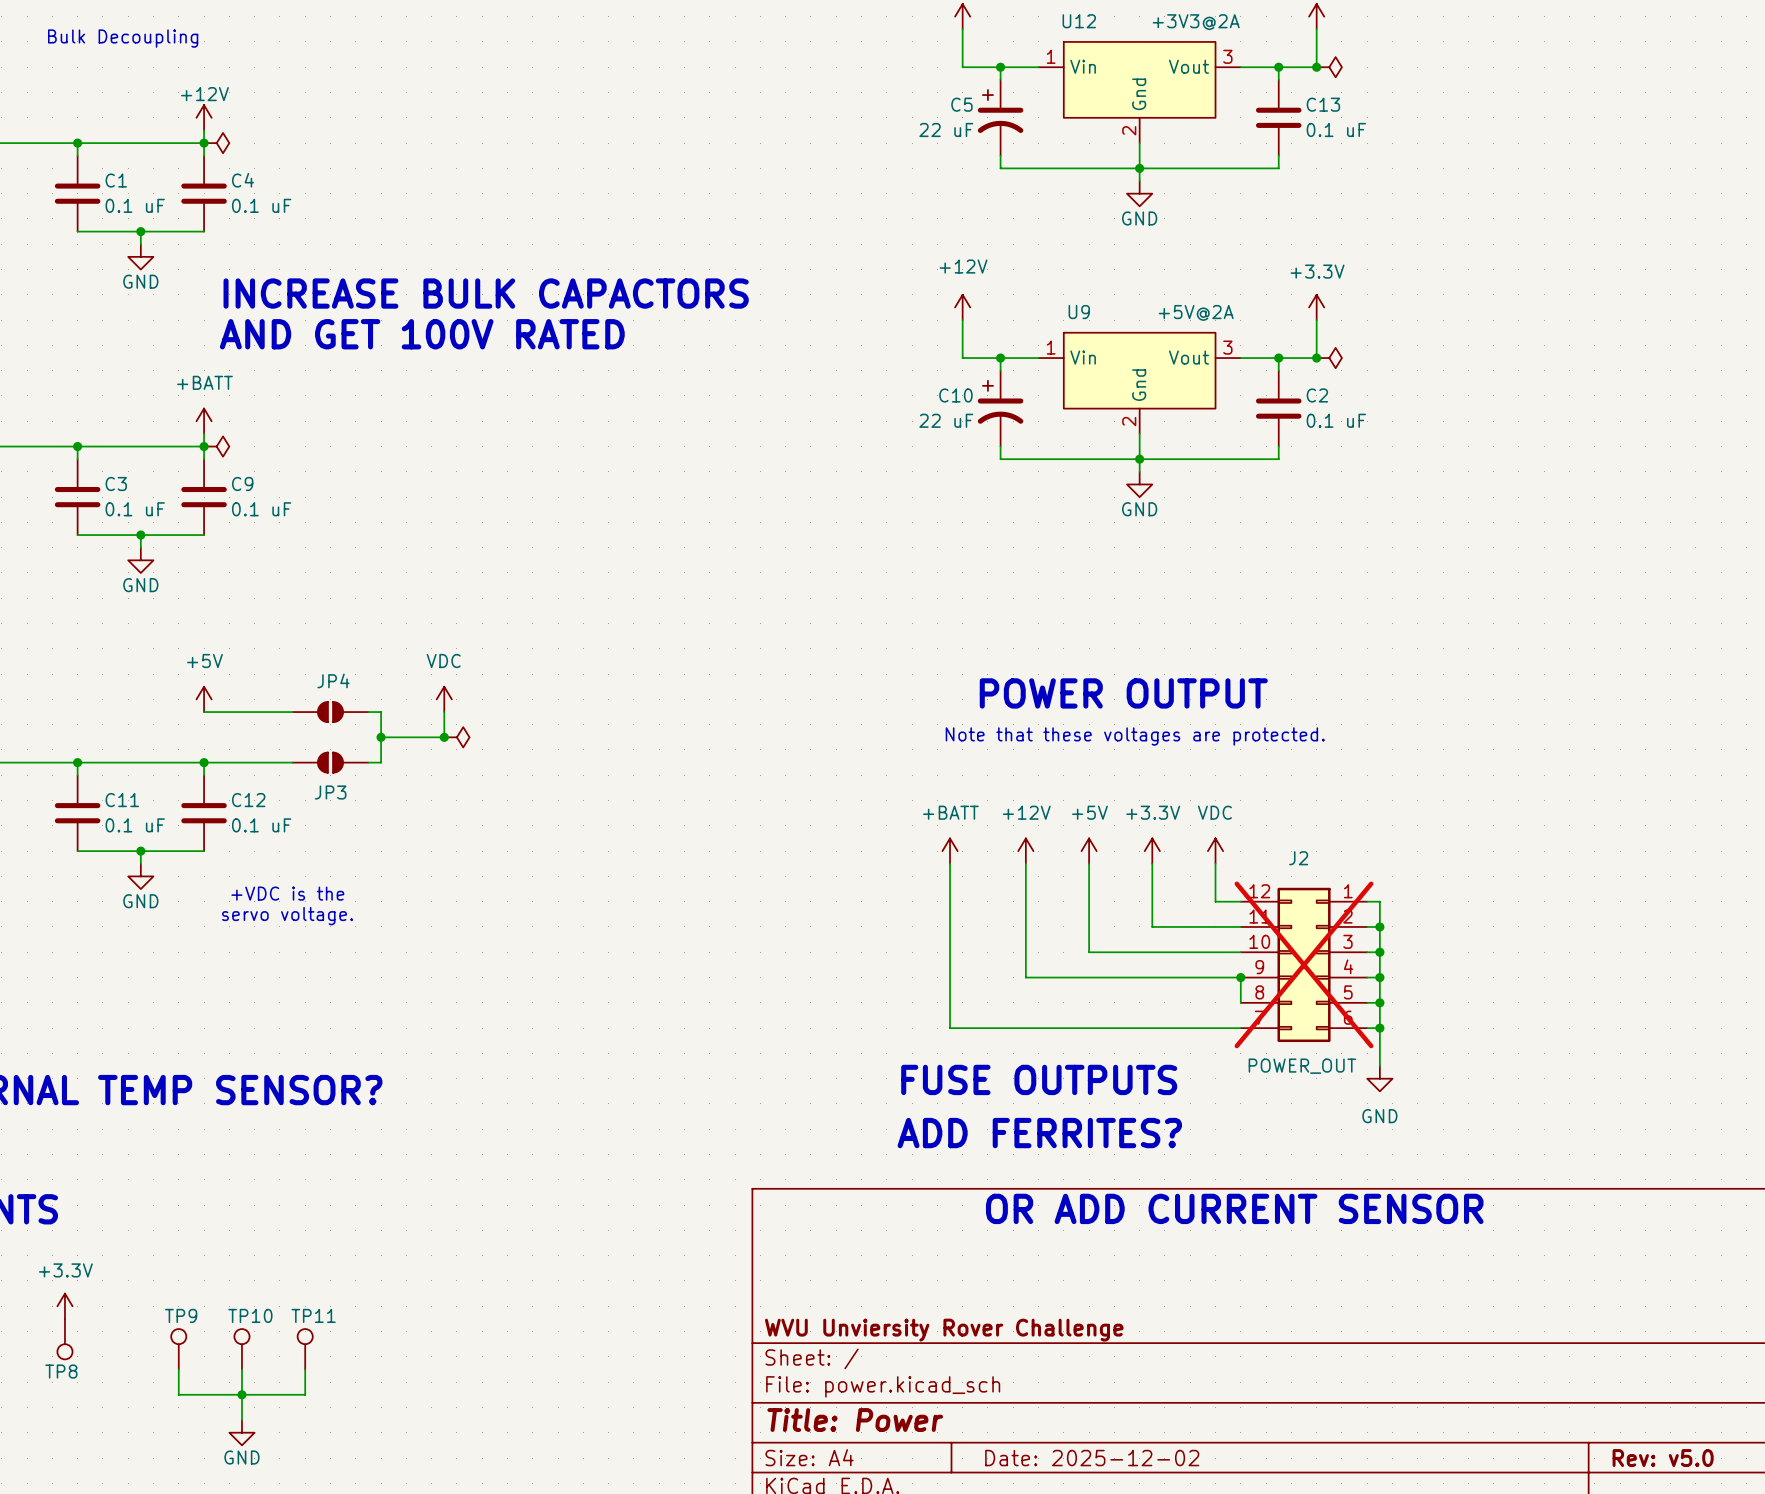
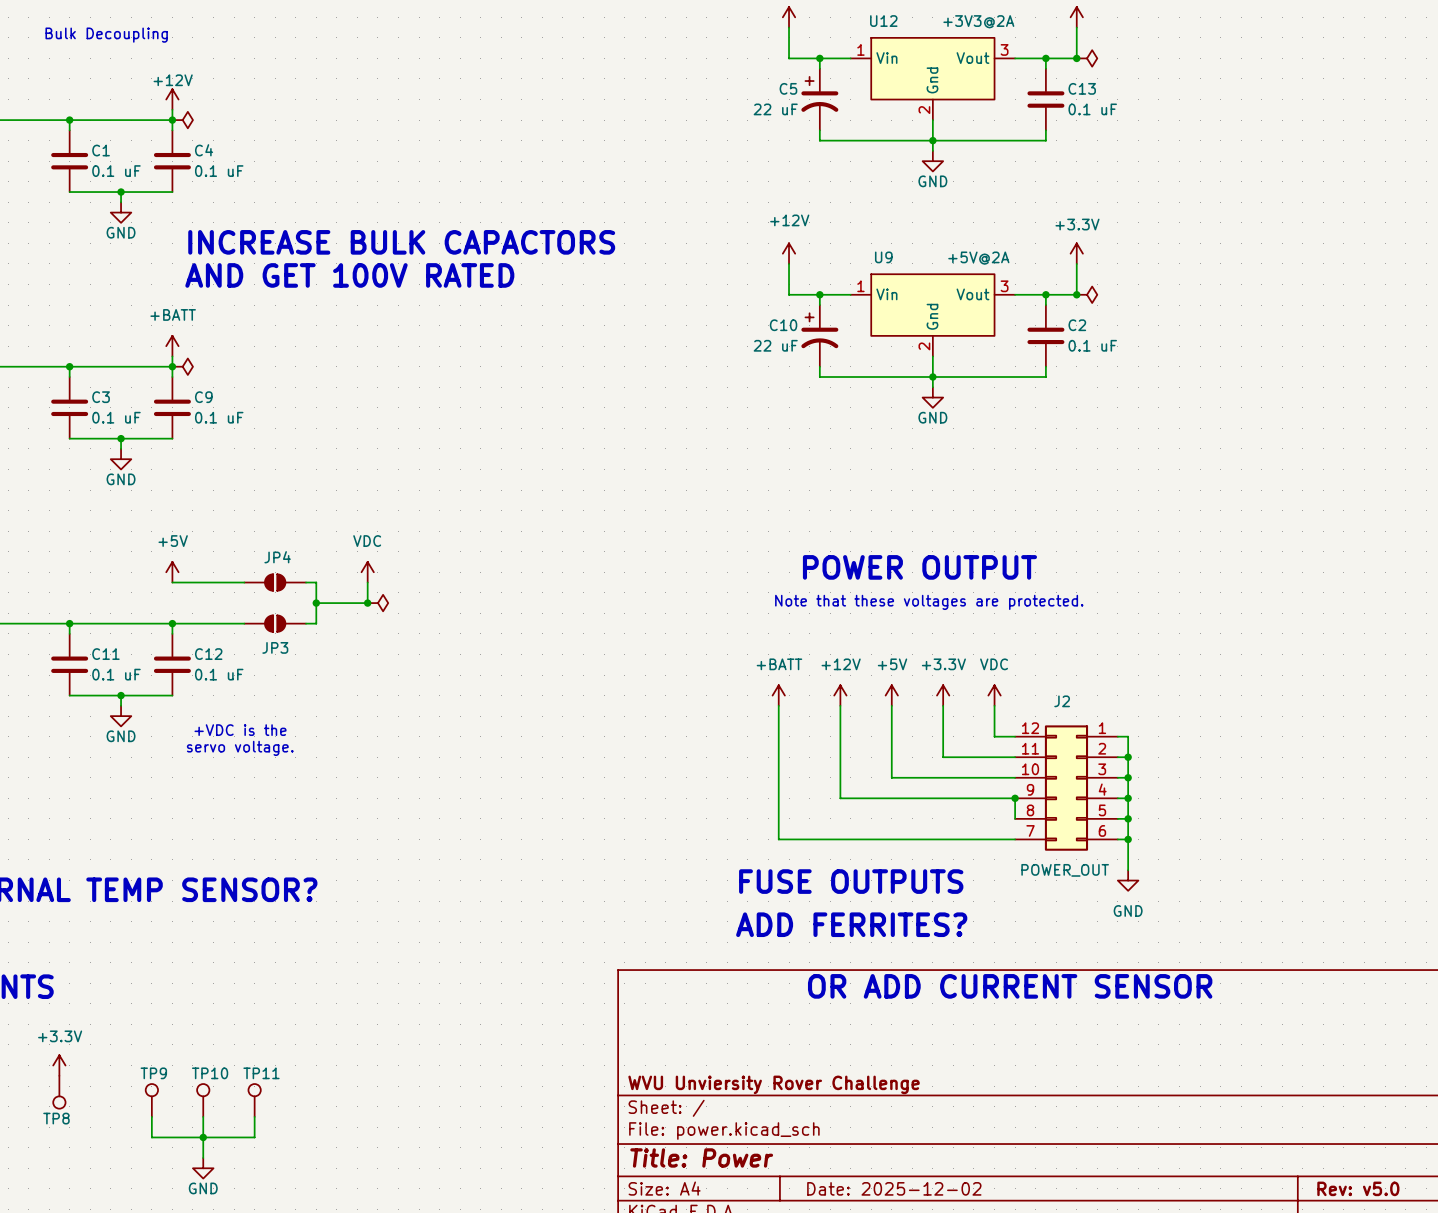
J2 do-not-place cross: (1304, 964) -> none

